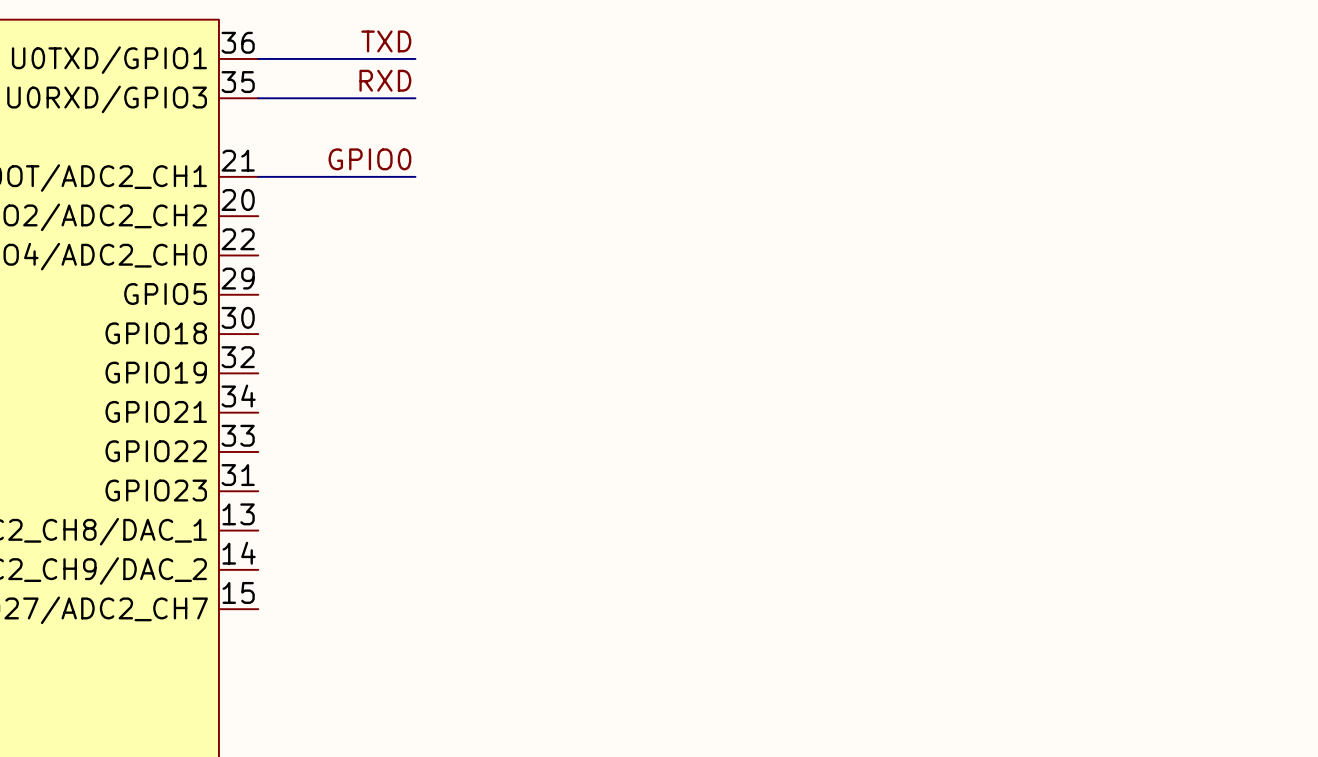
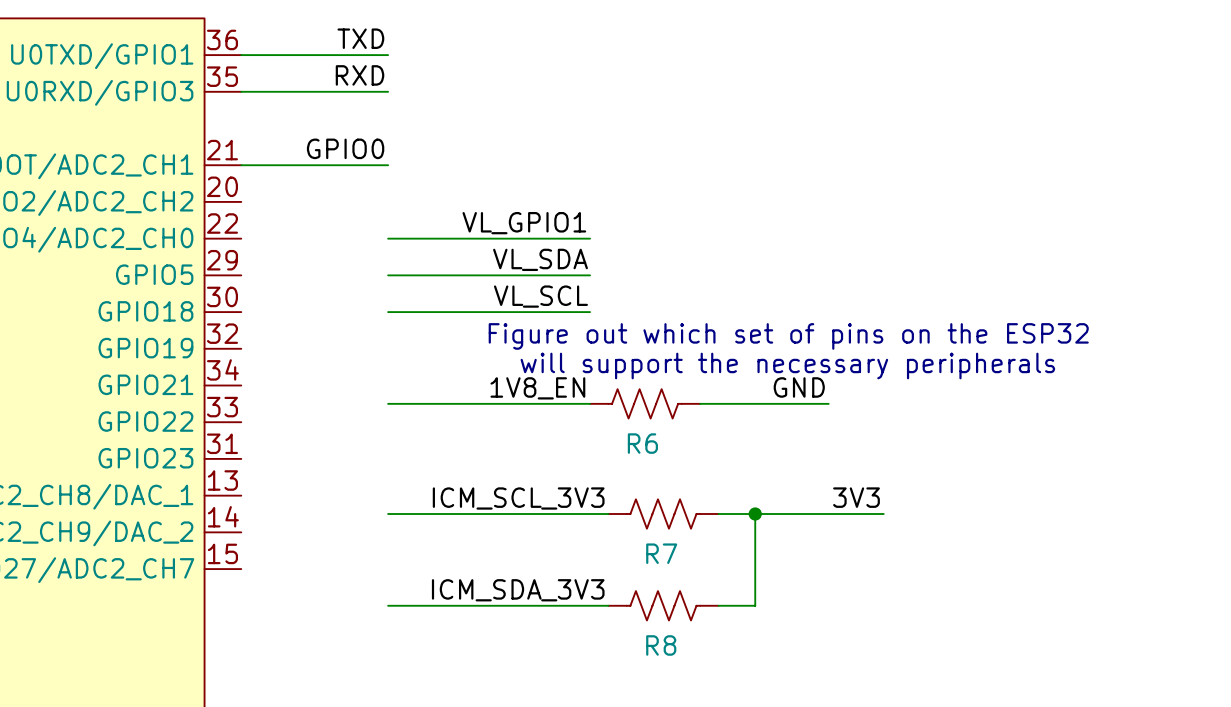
label: none -> VL_GPIO1 (524, 223)
wire: none -> (388, 238) (590, 238)
label: none -> VL_SDA (540, 259)
wire: none -> (388, 275) (590, 275)
label: none -> VL_SCL (540, 296)
wire: none -> (388, 312) (590, 312)
text: none -> Figure out which set of pins on the ESP32 (788, 336)
text: none -> will support the necessary peripherals (787, 366)
label: none -> GND (799, 387)
label: none -> 1V8_EN (537, 388)
wire: none -> (388, 403) (590, 403)
R6: none -> (645, 403)
wire: none -> (700, 403) (828, 403)
label: none -> 3V3 (856, 497)
label: none -> ICM_SCL_3V3 (518, 498)
wire: none -> (388, 514) (608, 514)
R7: none -> (663, 514)
wire: none -> (718, 514) (883, 514)
wire: none -> (755, 514) (755, 605) (718, 605)
junction: none -> (755, 514)
label: none -> ICM_SDA_3V3 (518, 590)
wire: none -> (388, 605) (608, 605)
R8: none -> (663, 605)

